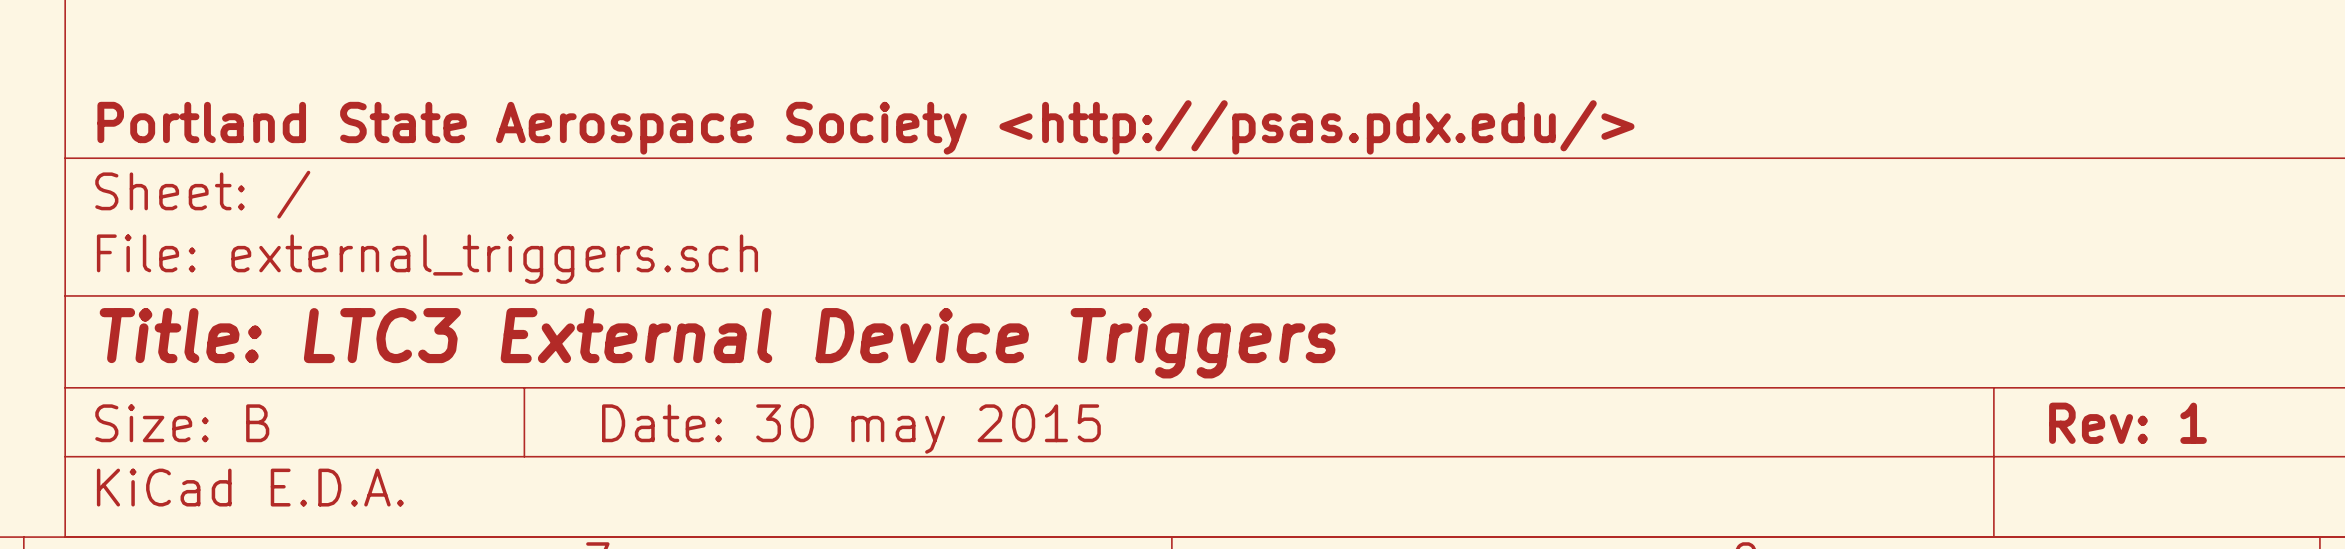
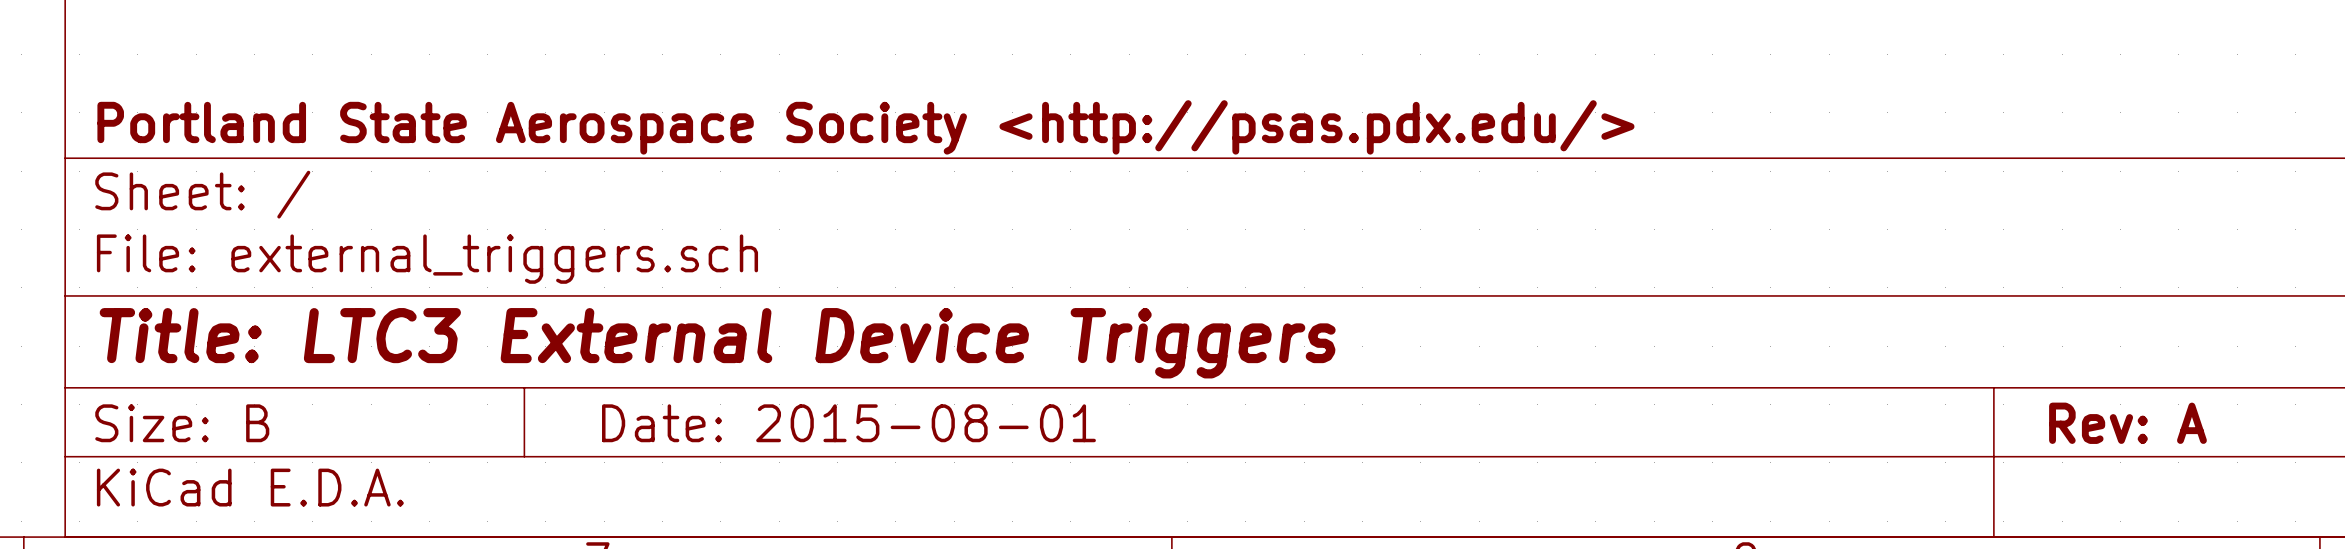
title block: Rev: 1 (2127, 423) -> Rev: A (2127, 423)
title block: Date: 30 may 2015 (851, 429) -> Date: 2015-08-01 (848, 423)

